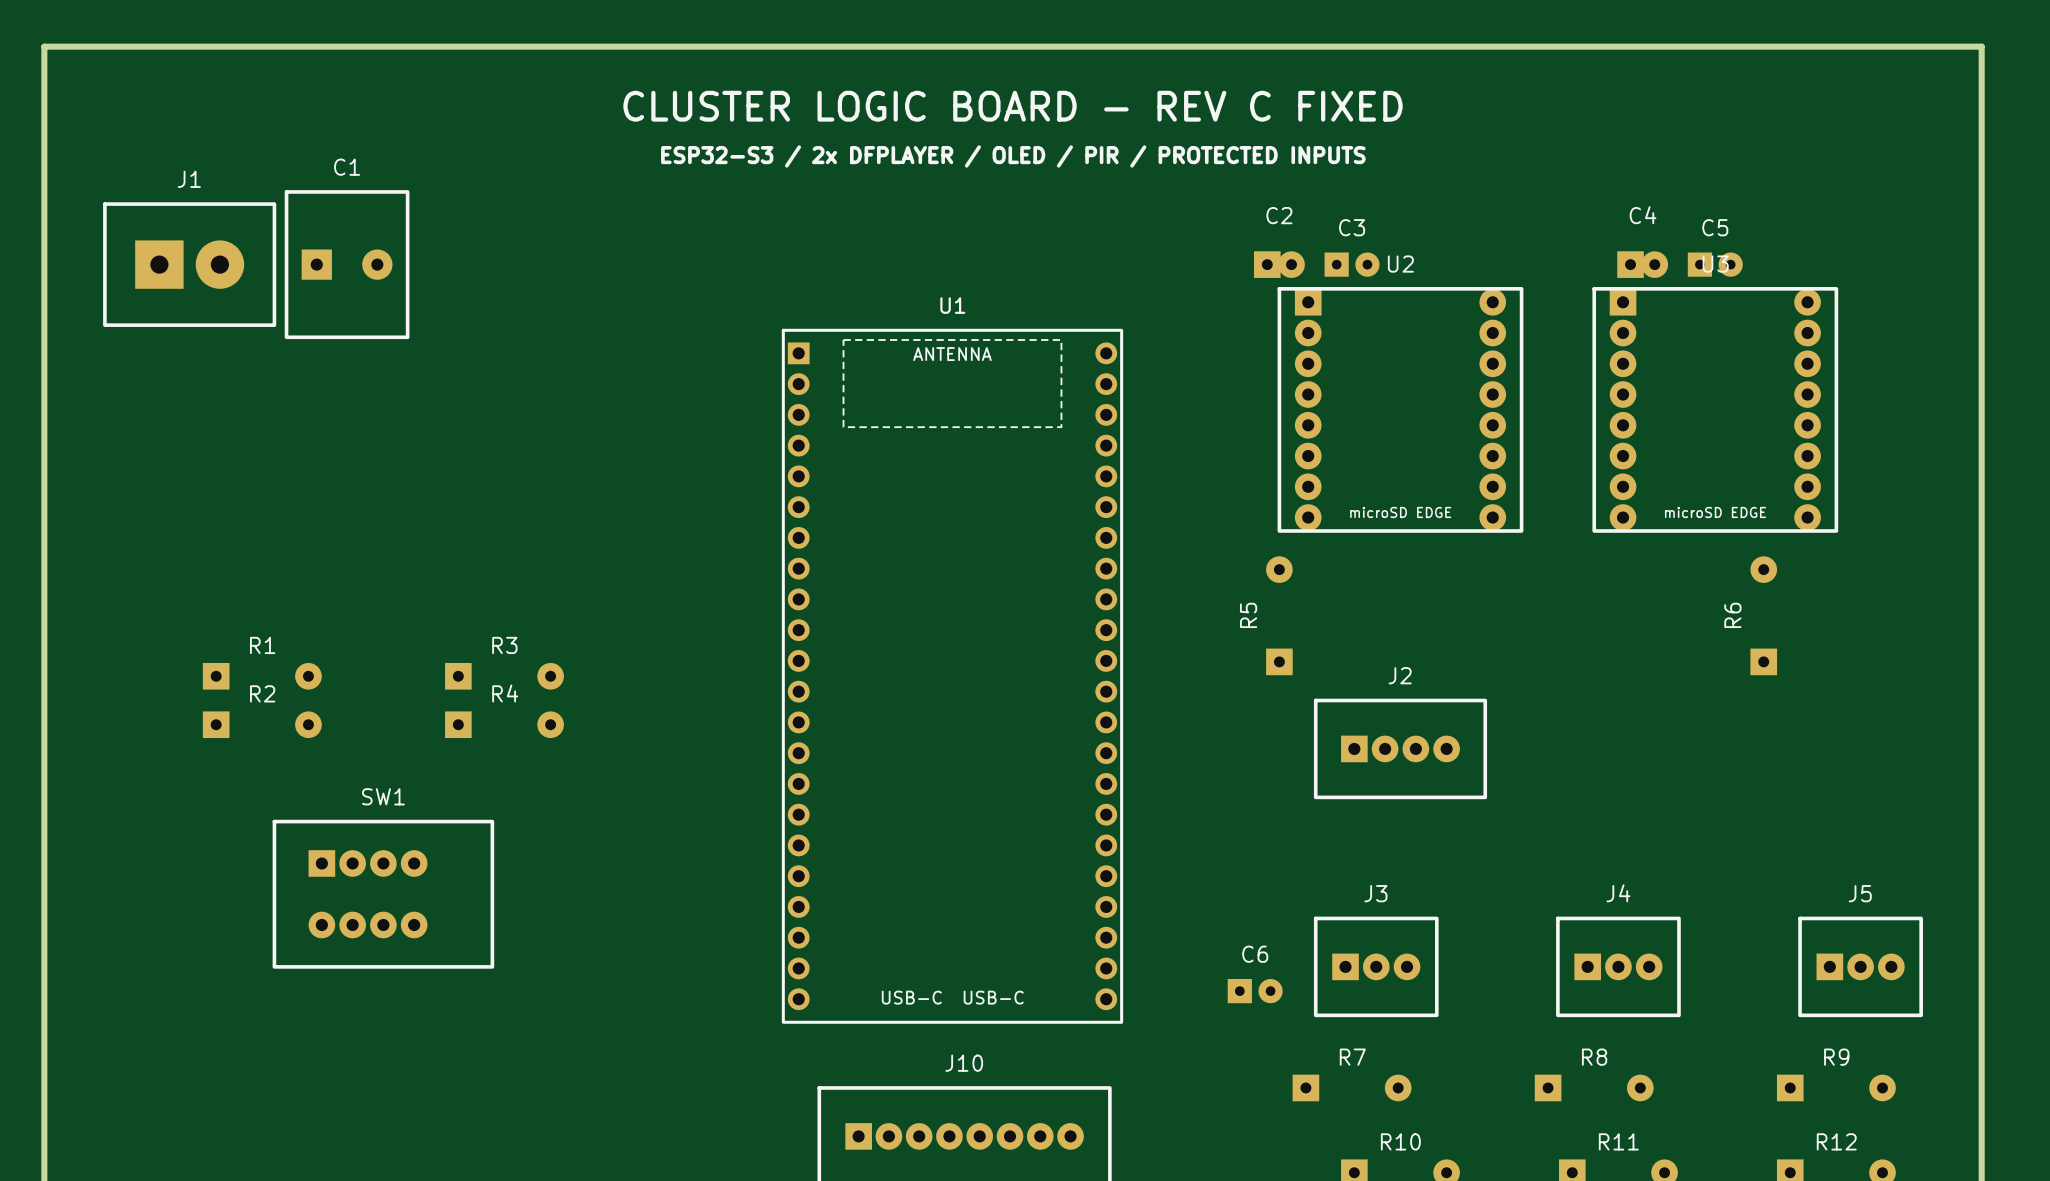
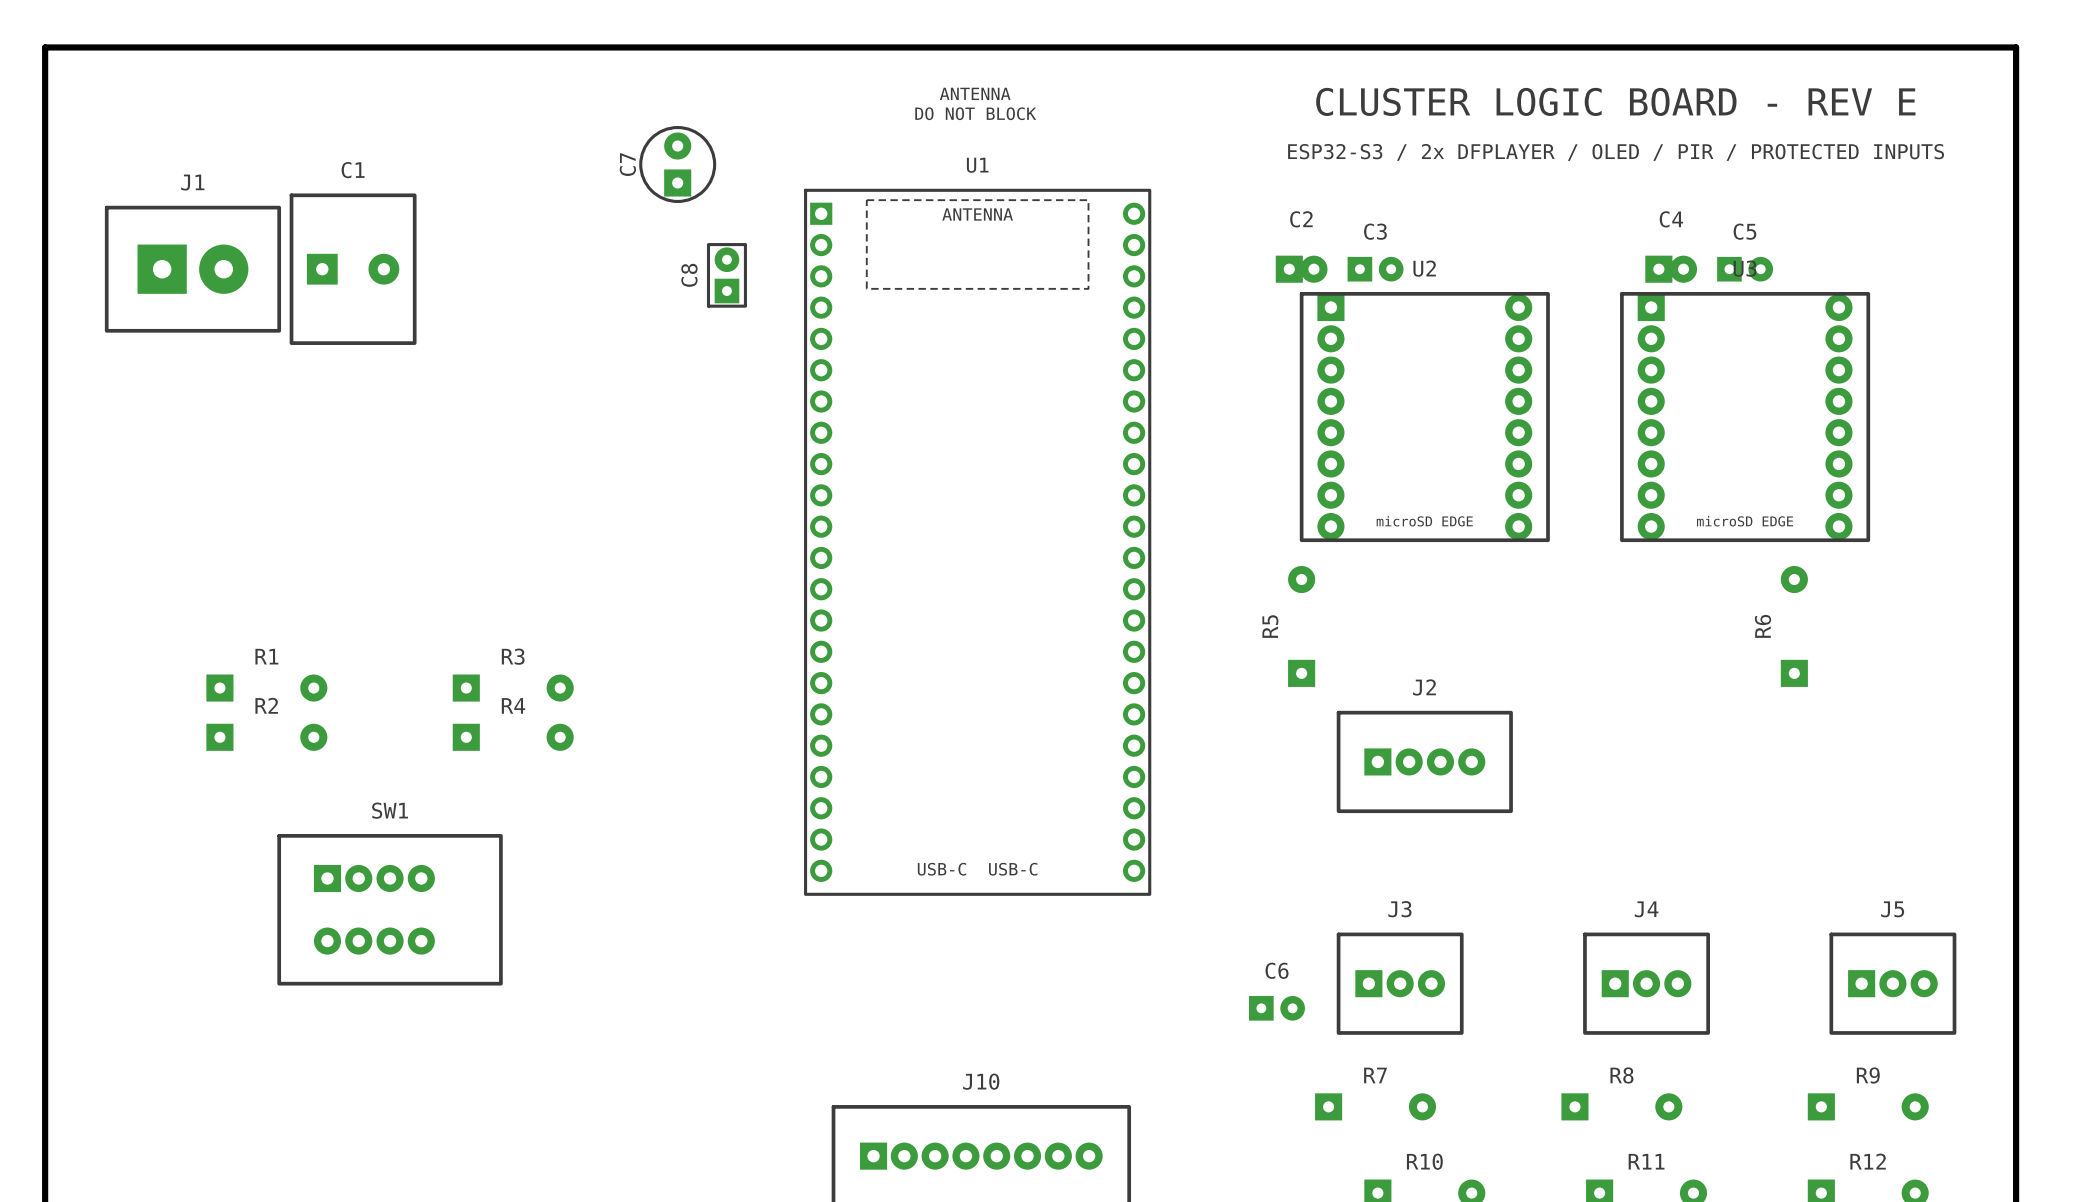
text: none -> ANTENNA (975, 93)
text: none -> CLUSTER LOGIC BOARD - REV E (1615, 101)
text: CLUSTER LOGIC BOARD - REV C FIXED (1013, 106) -> none
text: none -> DO NOT BLOCK (975, 113)
text: none -> ESP32-S3 / 2x DFPLAYER / OLED / PIR / PROTECTED INPUTS (1616, 152)
text: ESP32-S3 / 2x DFPLAYER / OLED / PIR / PROTECTED INPUTS (1013, 156) -> none
C7: none -> (677, 164)
C8: none -> (726, 275)
U1 position: (952, 676) -> (977, 542)

